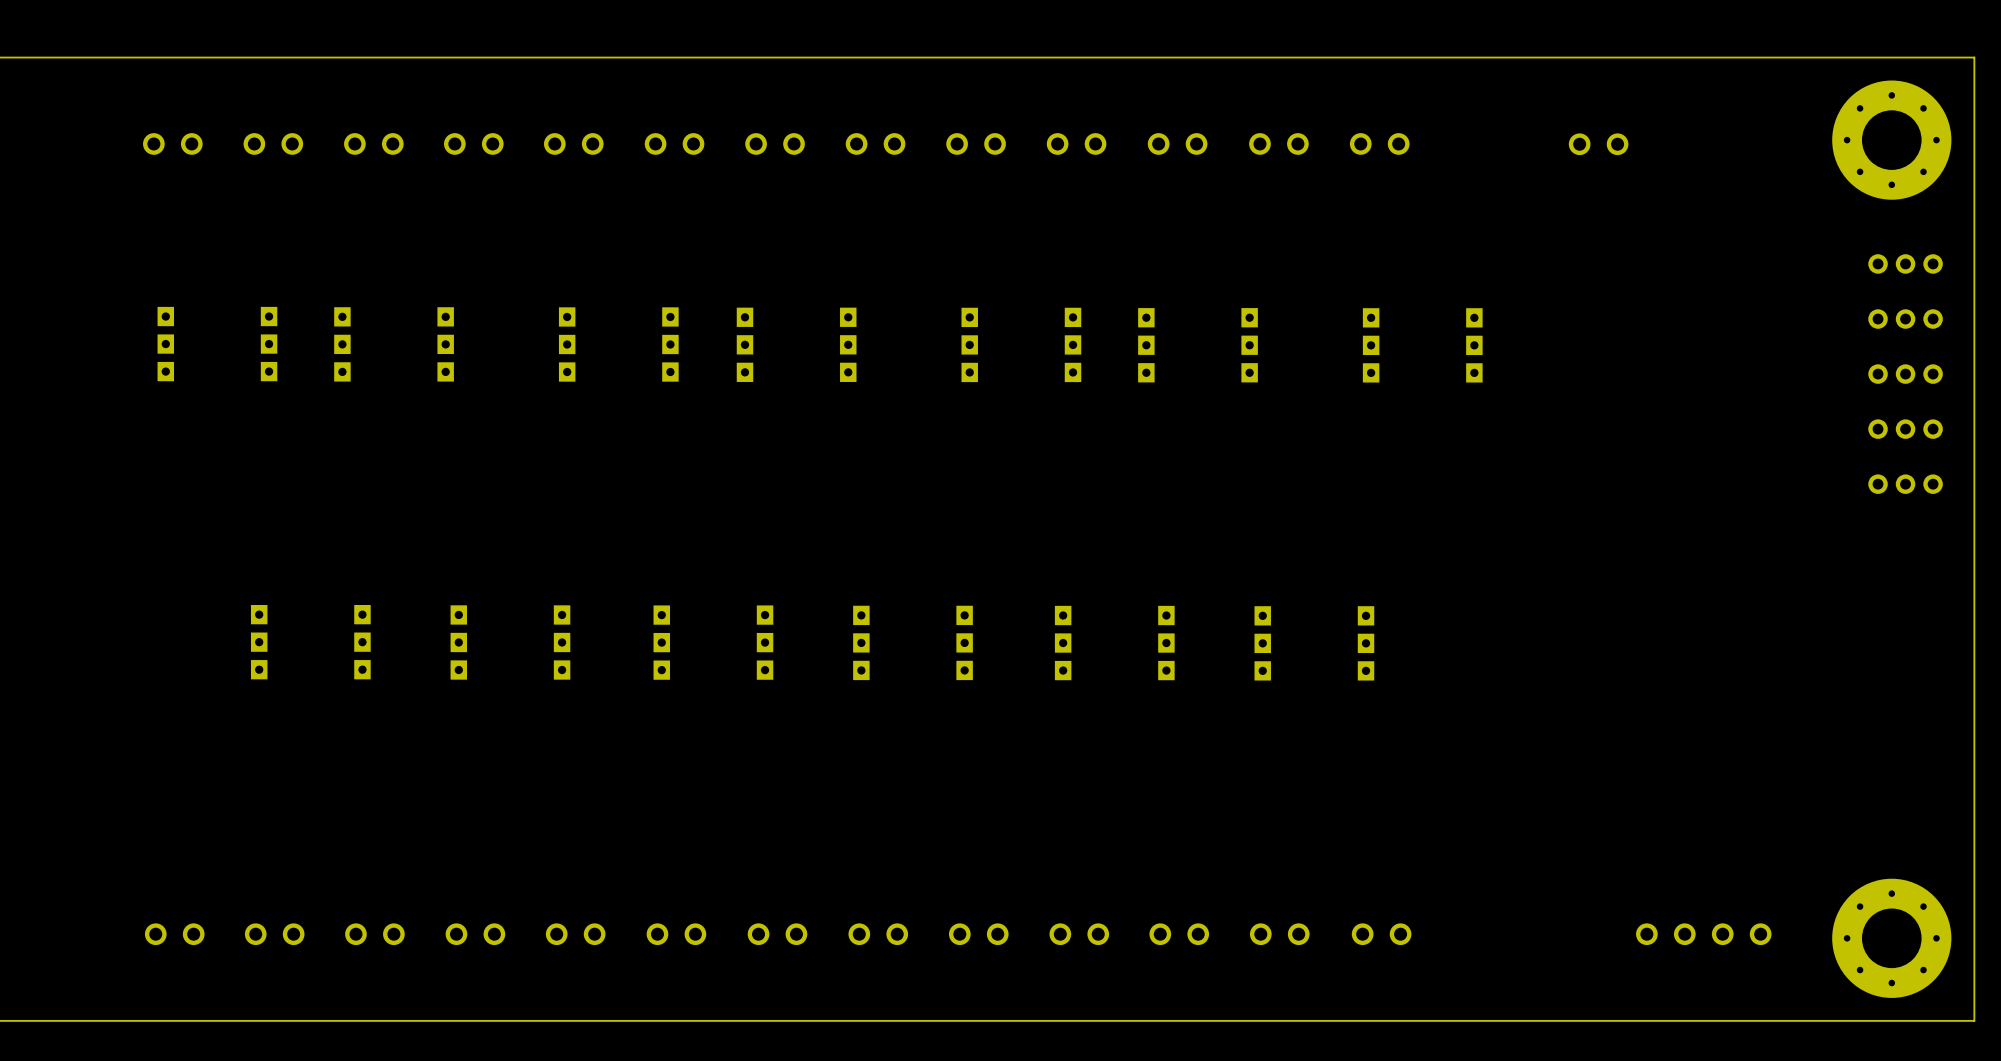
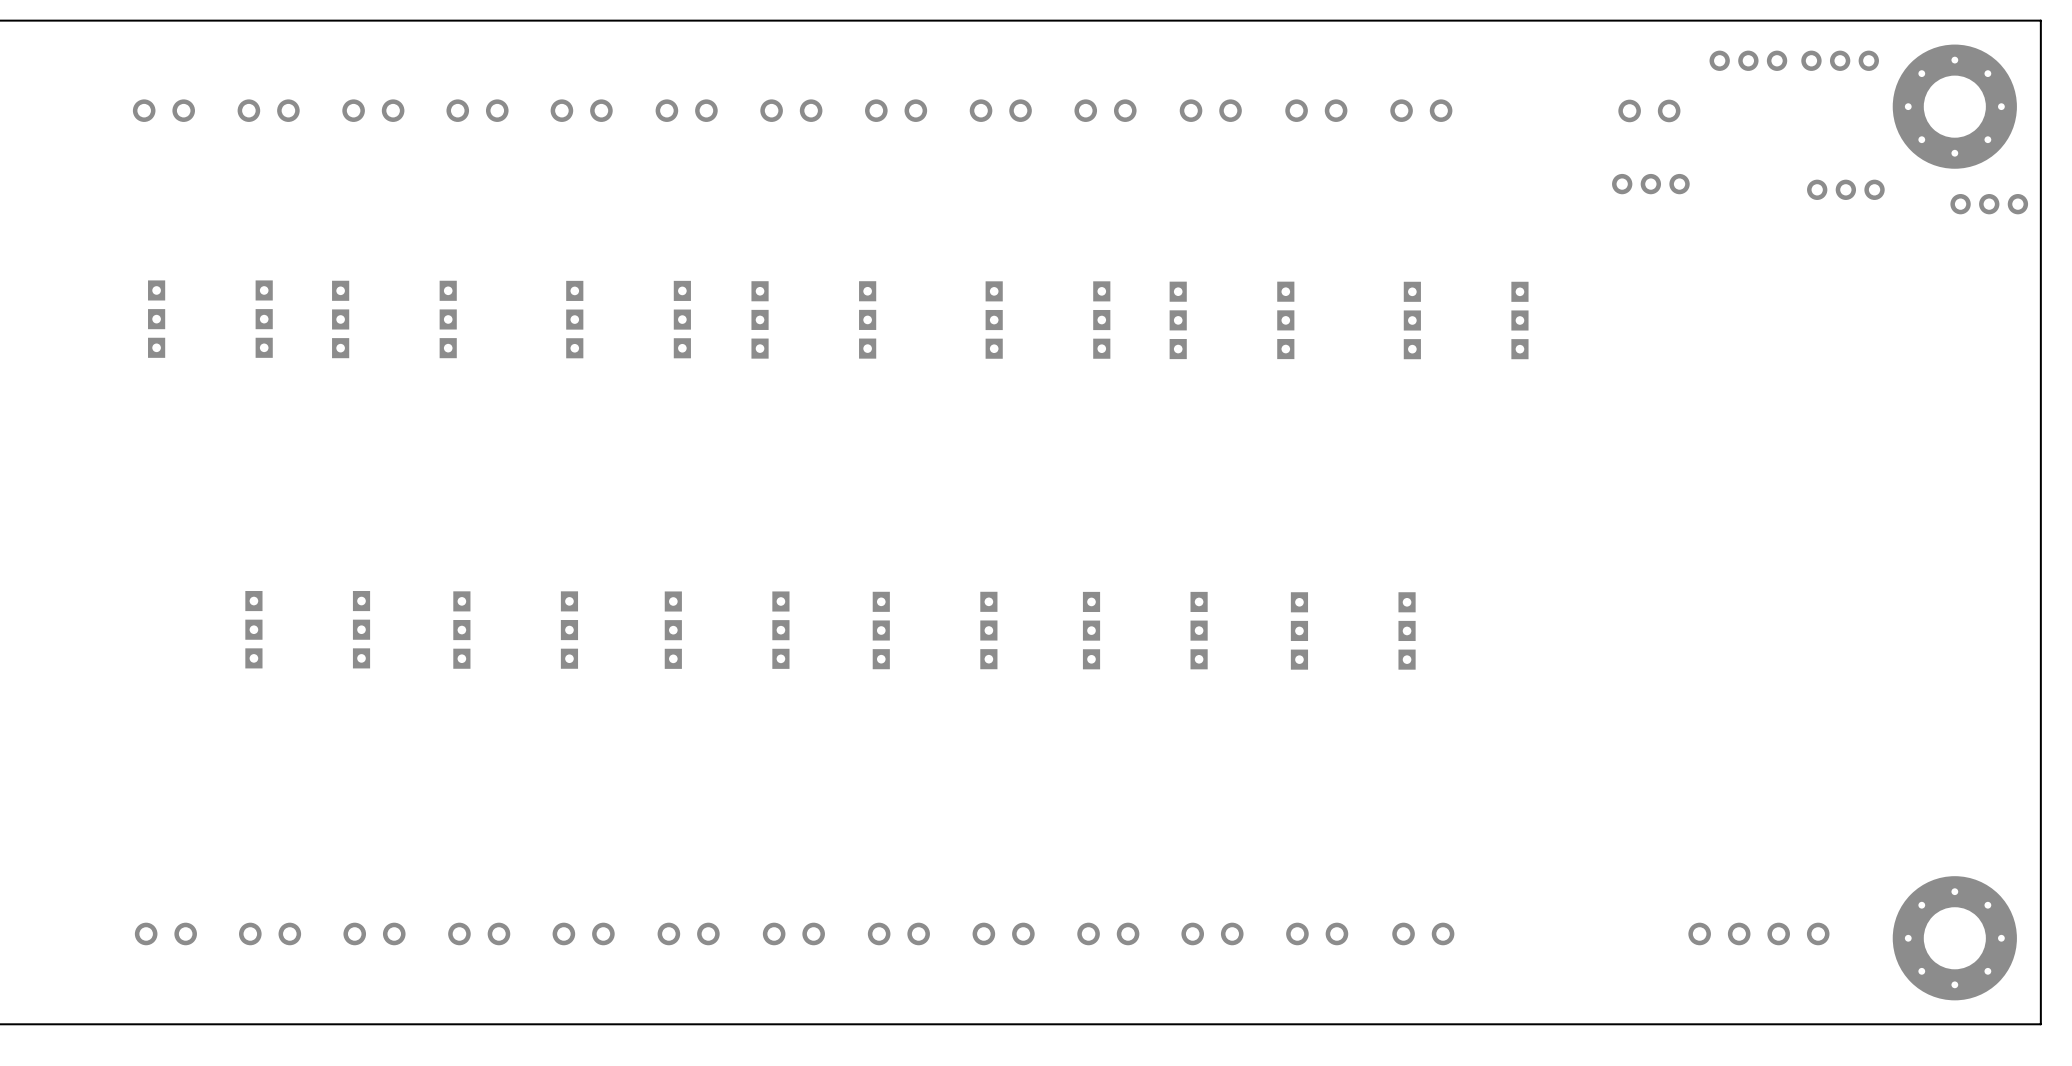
part: none -> (1748, 60)
part: none -> (1840, 60)
part: none -> (1650, 184)
part: none -> (1845, 189)
part position: (1905, 263) -> (1989, 204)
part: (1905, 319) -> none
part: (1905, 374) -> none
part: (1905, 429) -> none
part: (1905, 484) -> none

